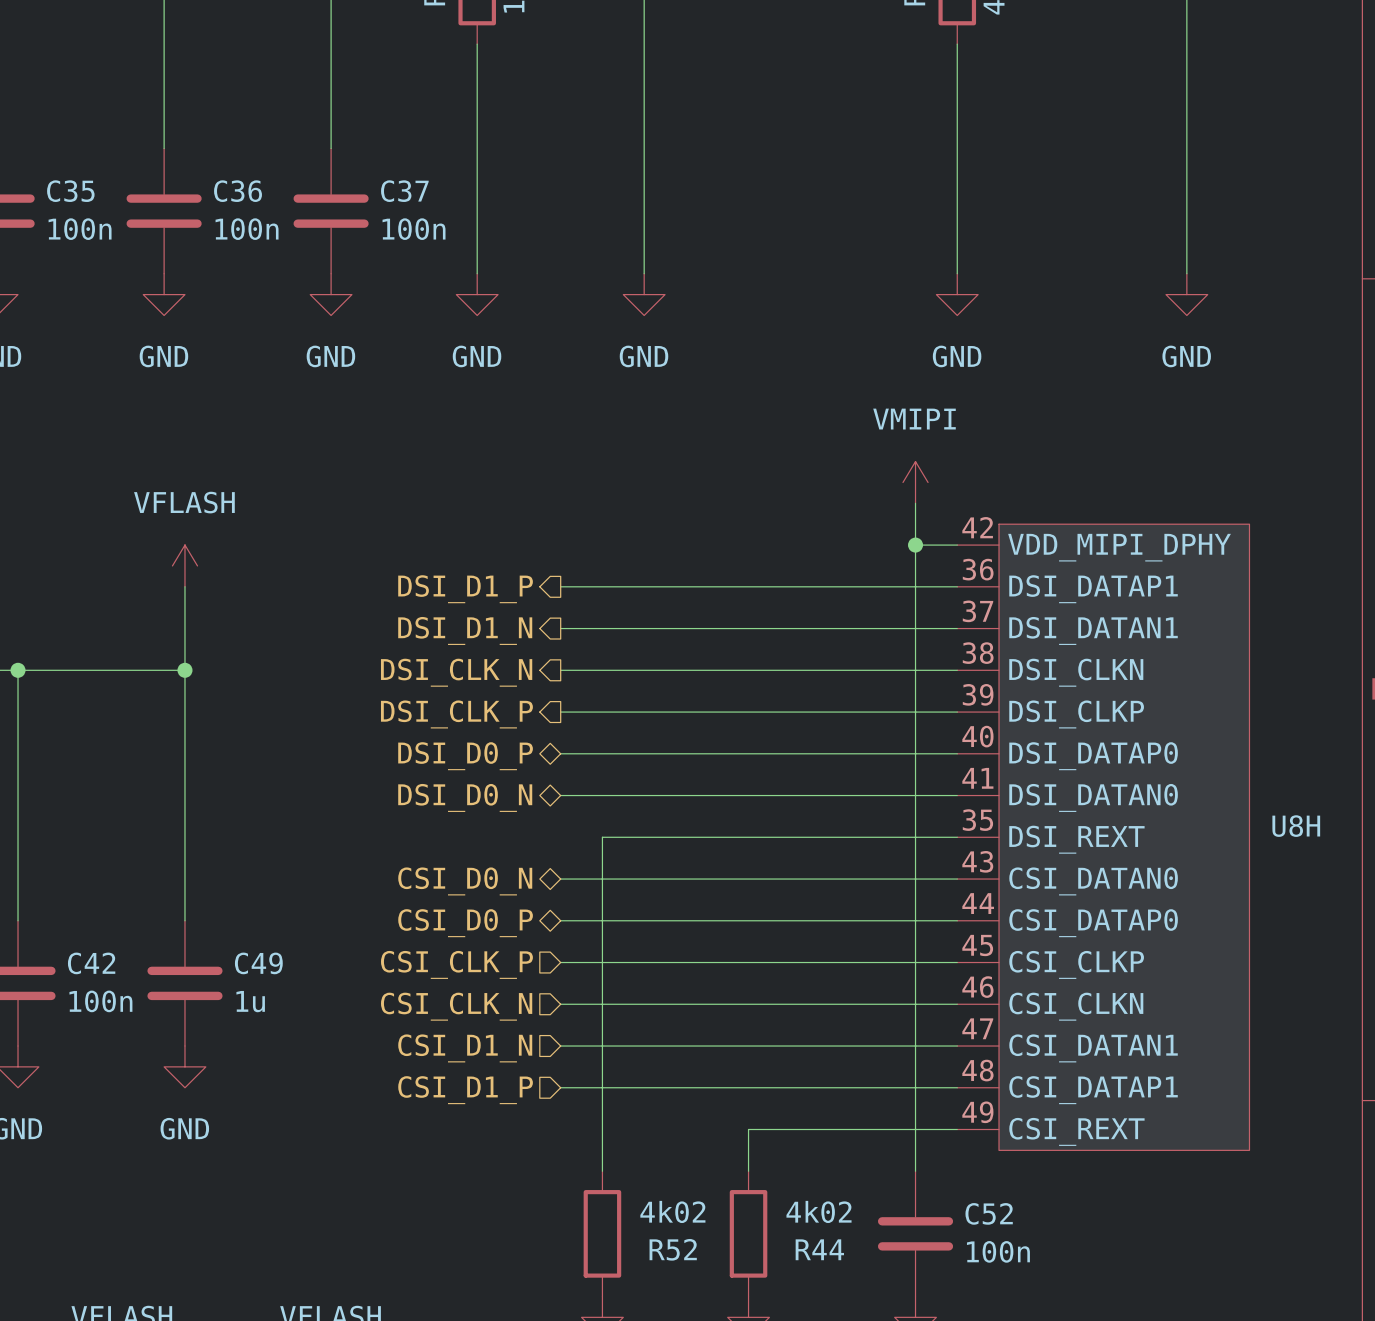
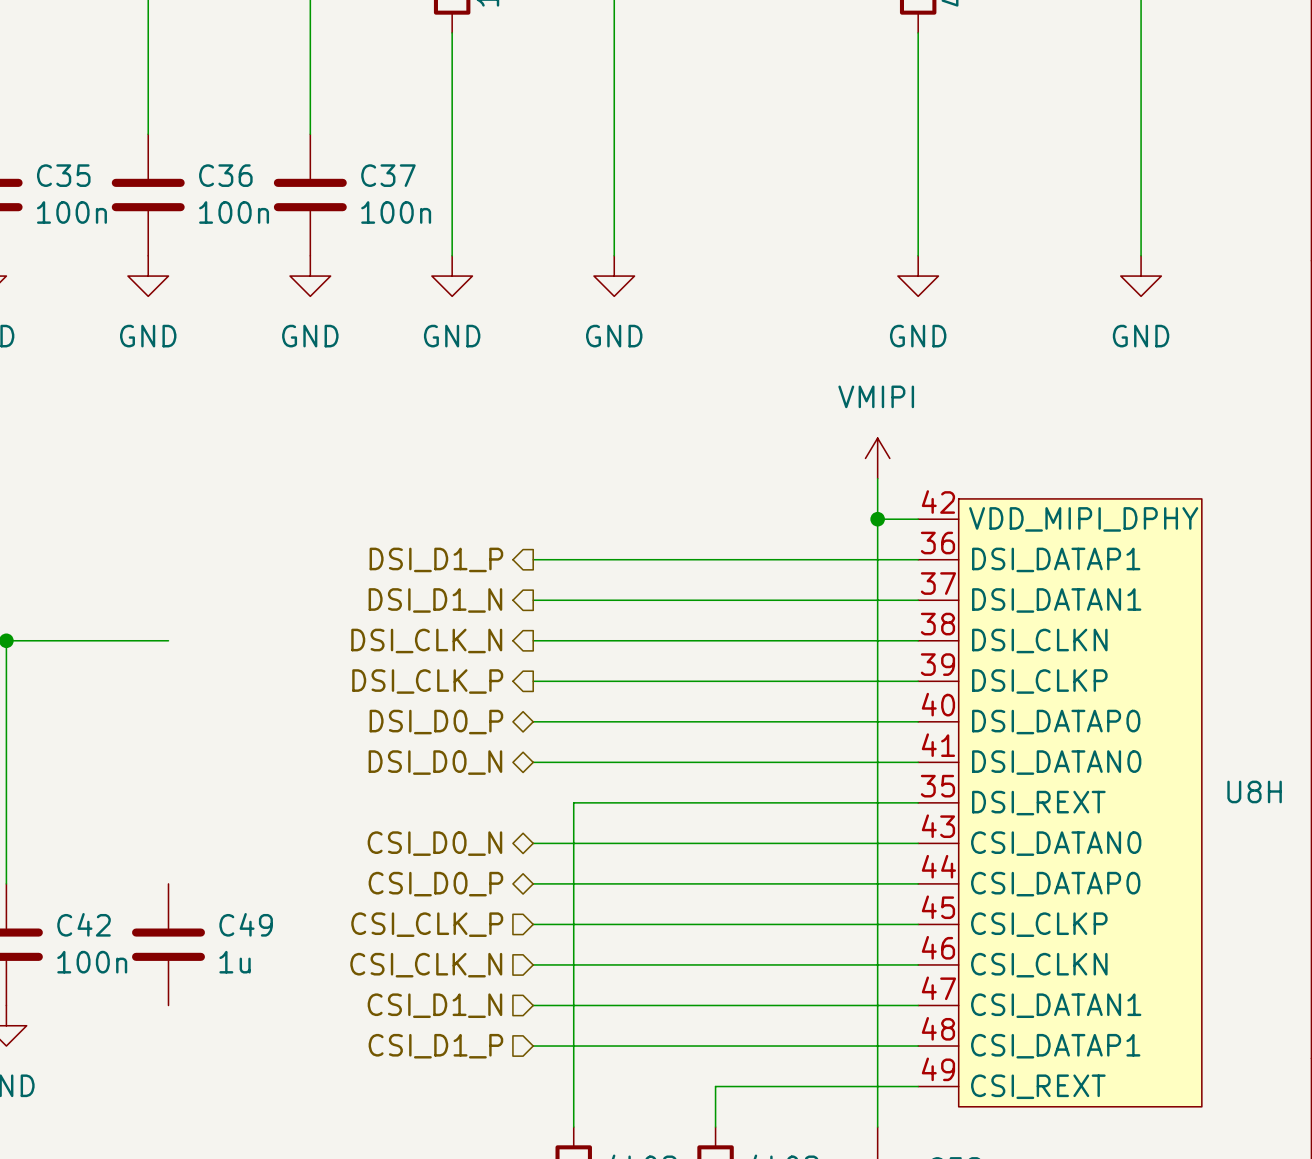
power symbol: VFLASH (184, 565) -> none
wire: (184, 586) (184, 920) -> none
junction: (184, 670) -> none
power symbol: GND (184, 1066) -> none

